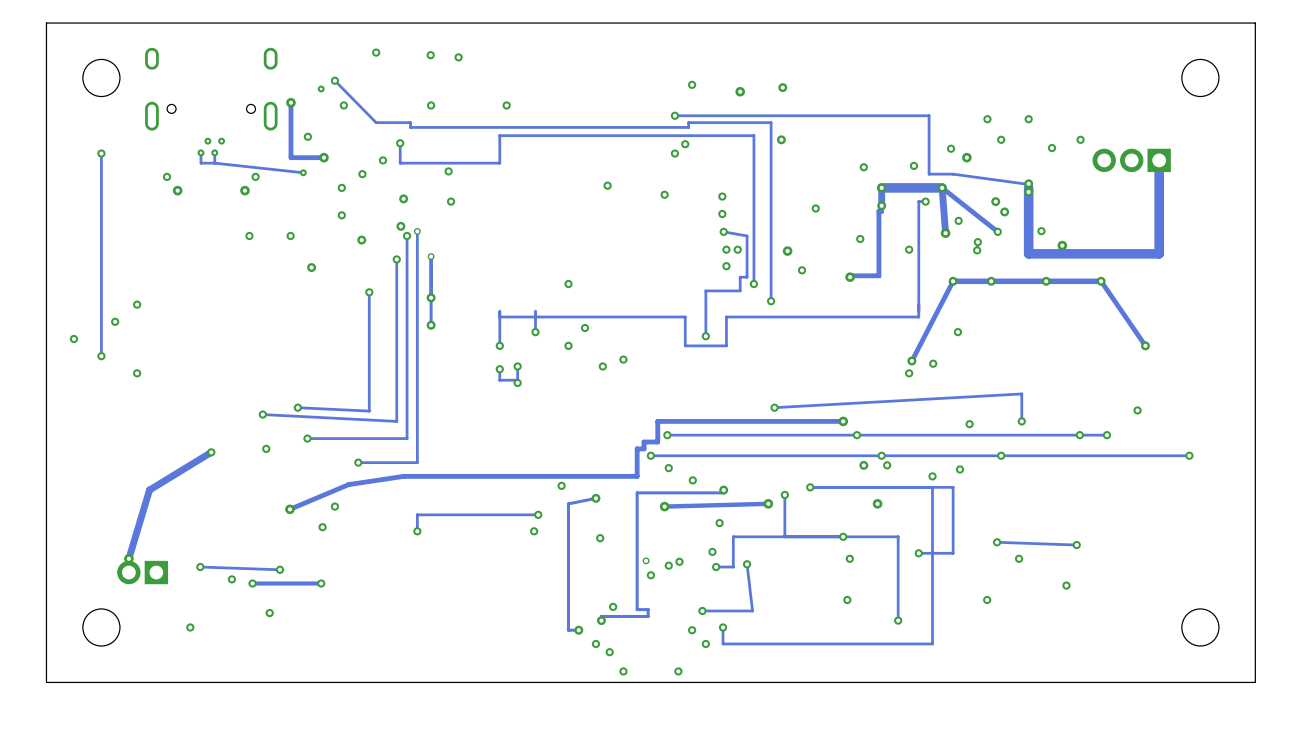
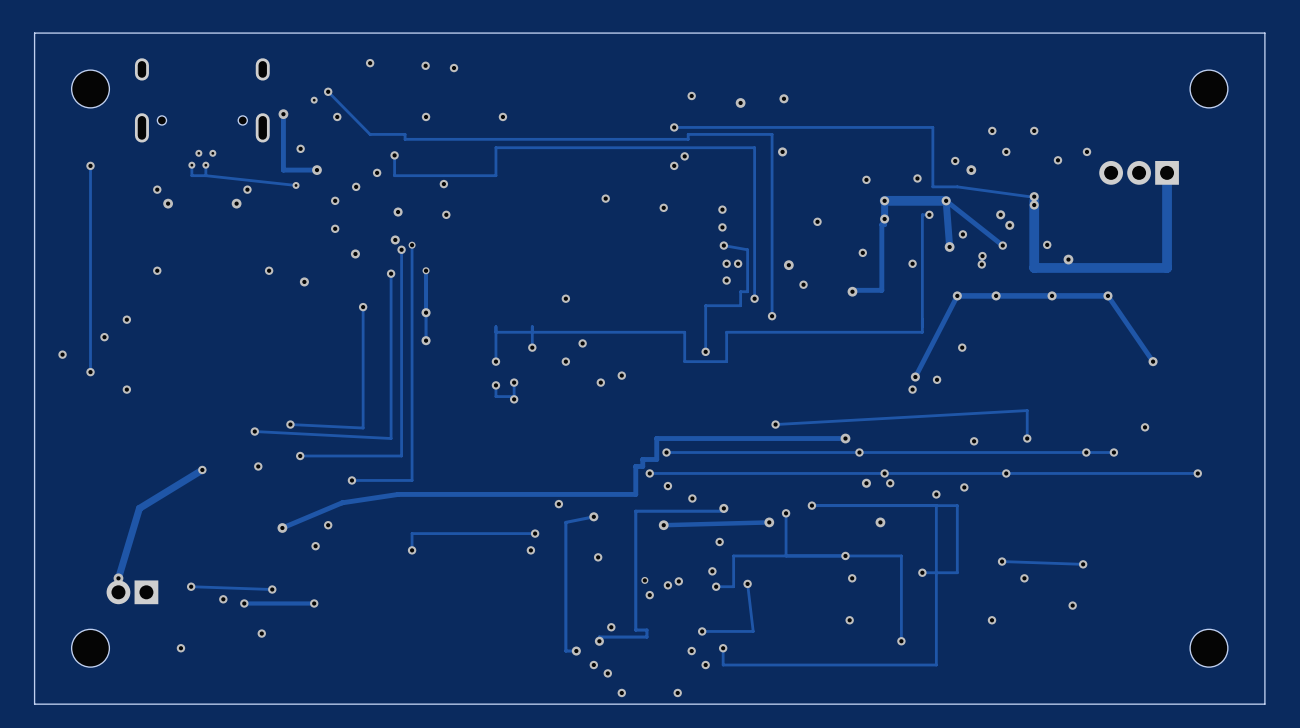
via: (249, 235) -> none
via: (290, 235) -> none
via: none -> (157, 270)
via: none -> (269, 270)

